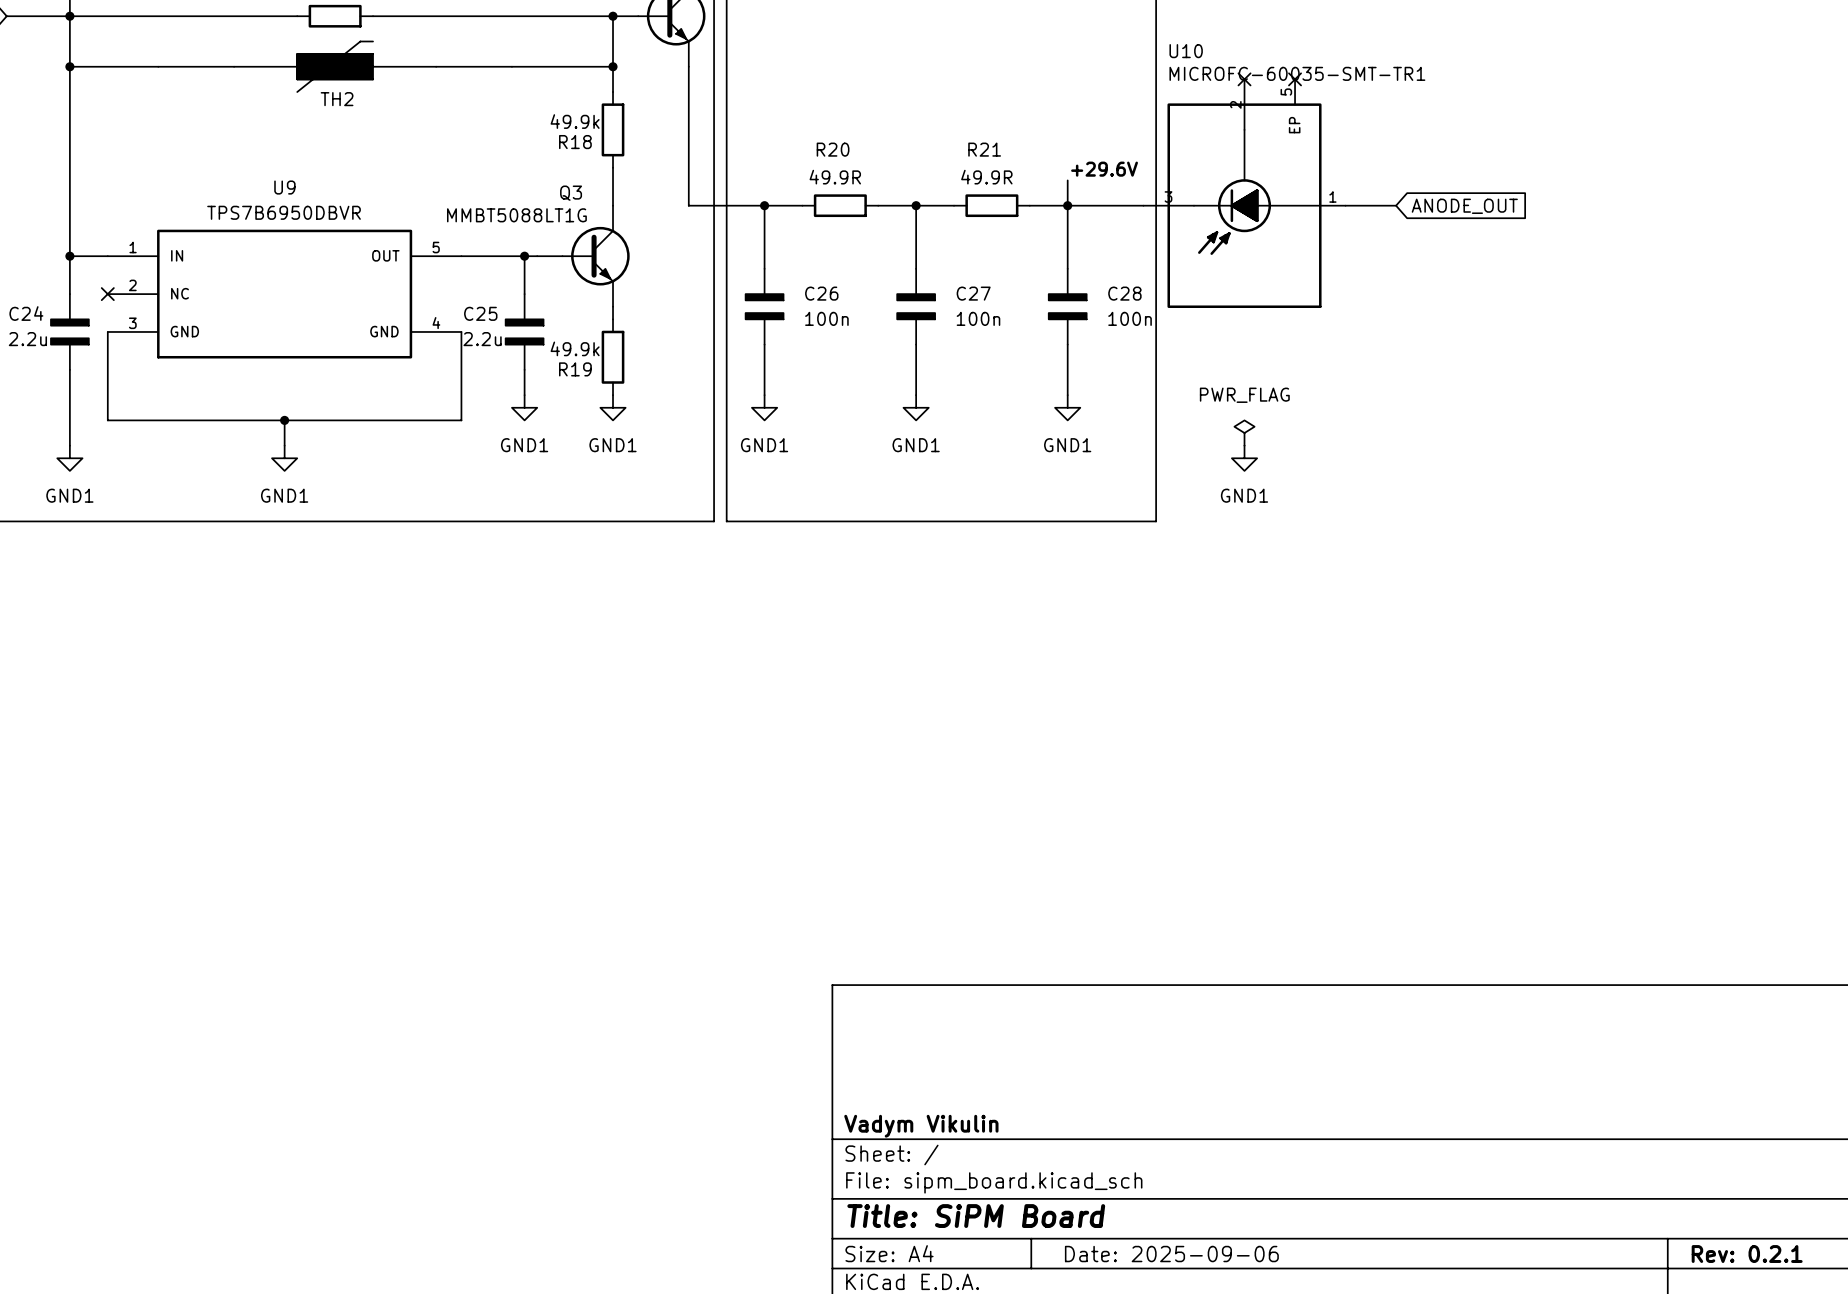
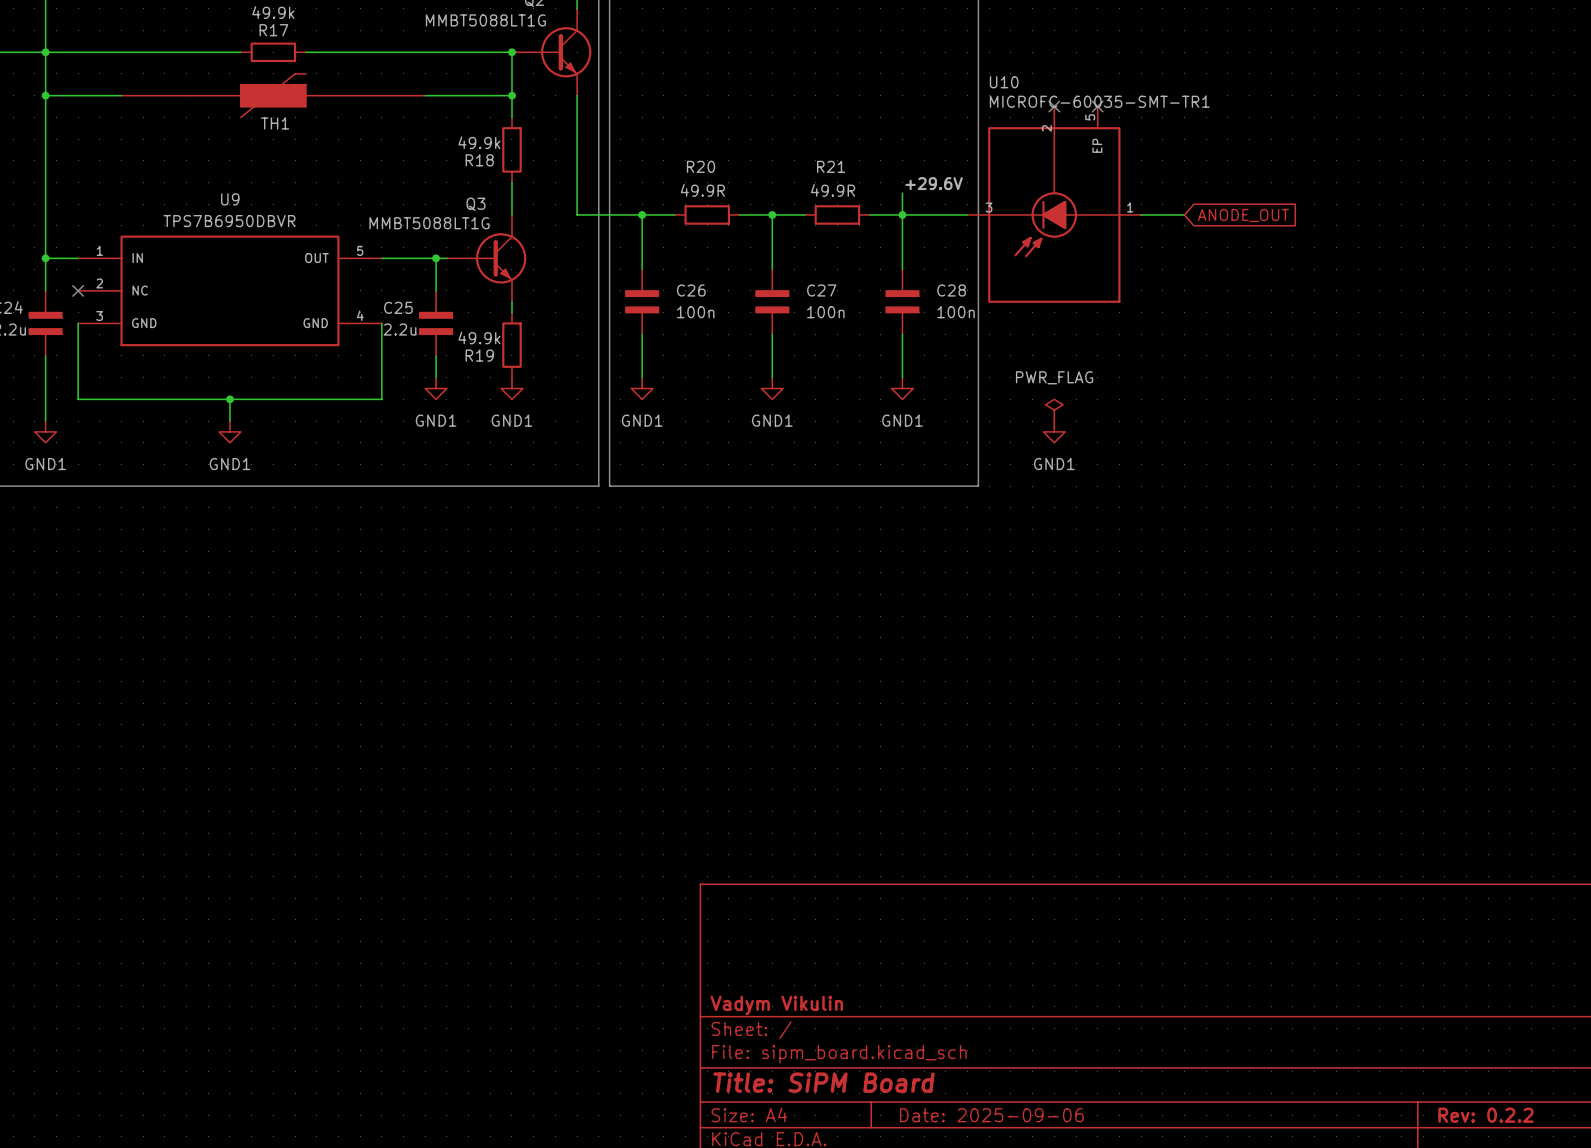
TH2 name: TH2 (337, 99) -> TH1 (275, 123)
title block: Rev: 0.2.1 (1747, 1254) -> Rev: 0.2.2 (1485, 1115)

